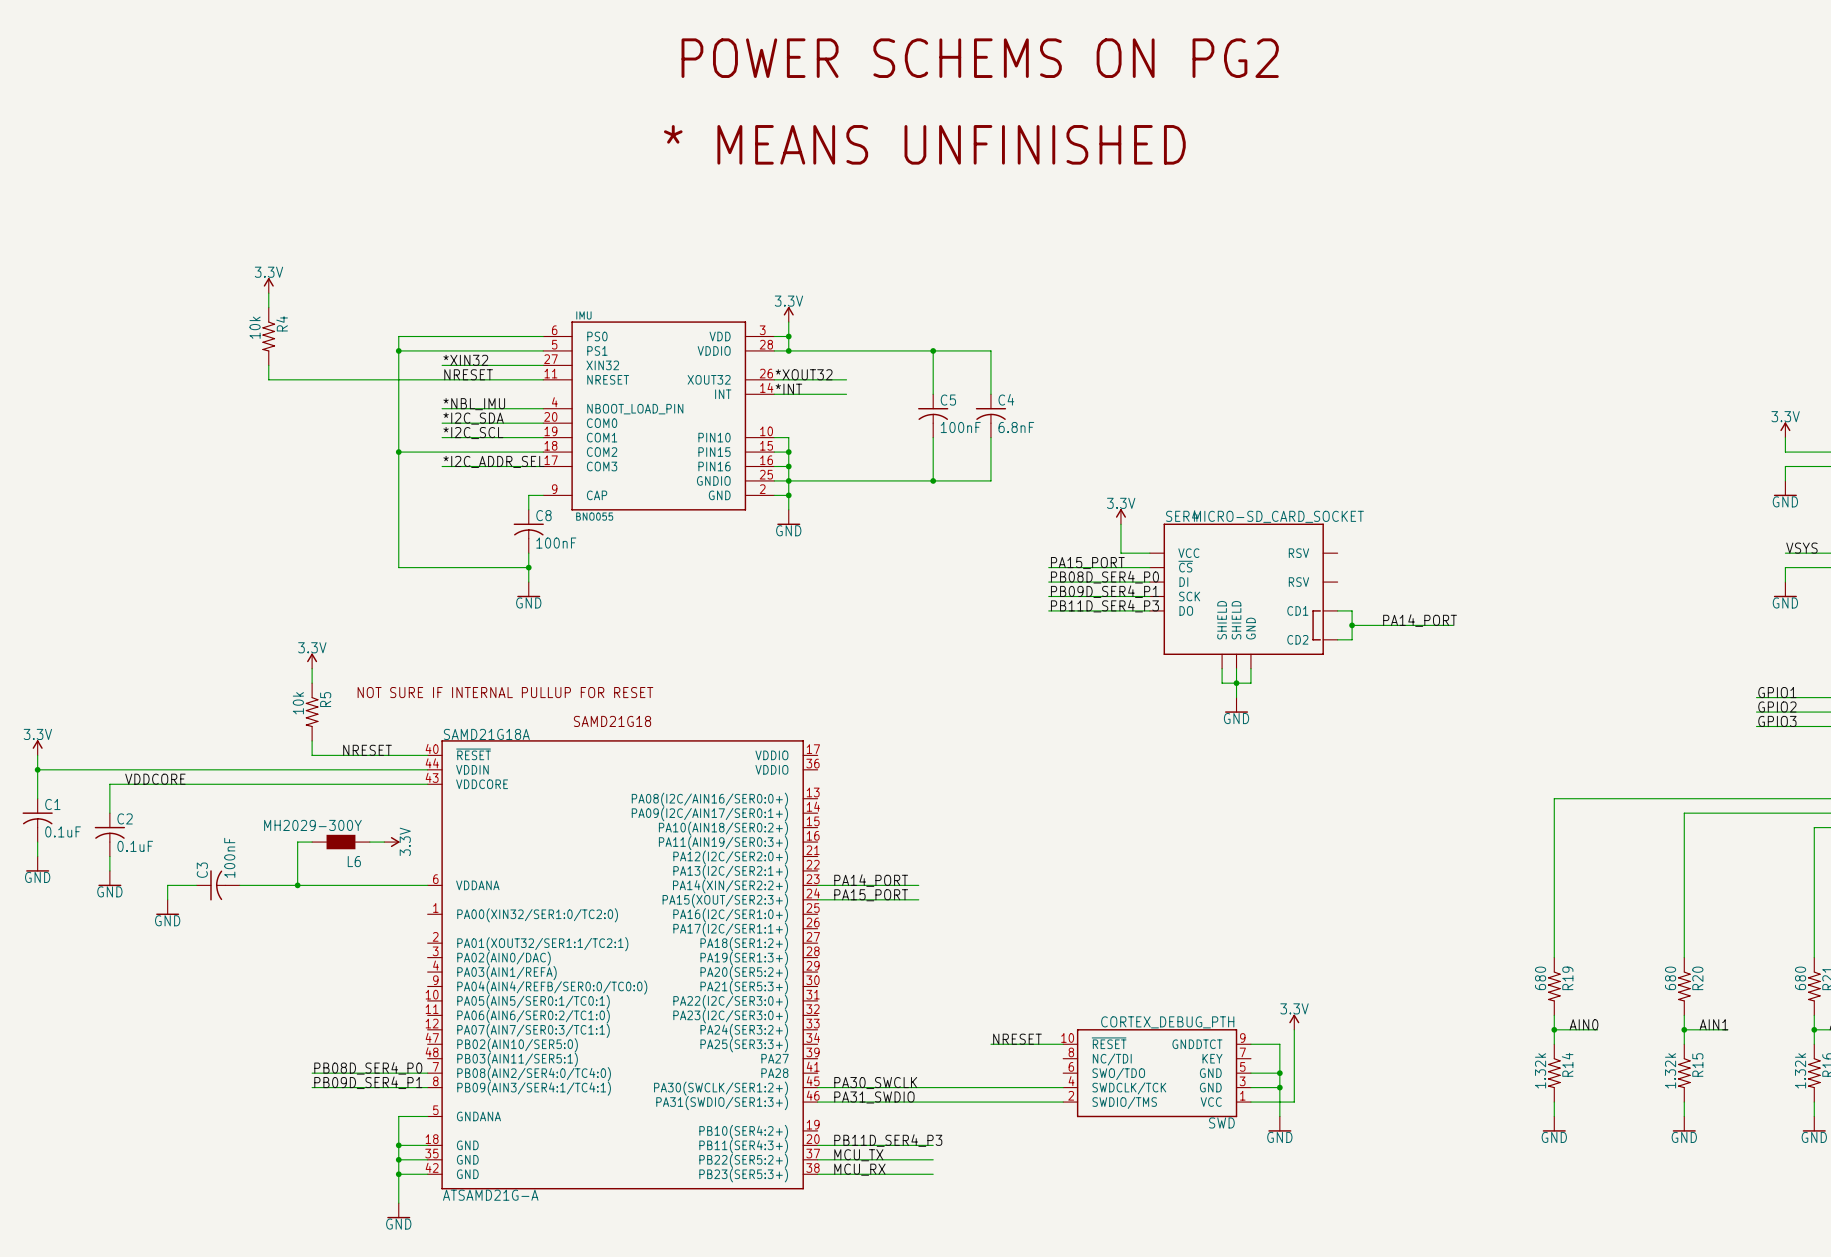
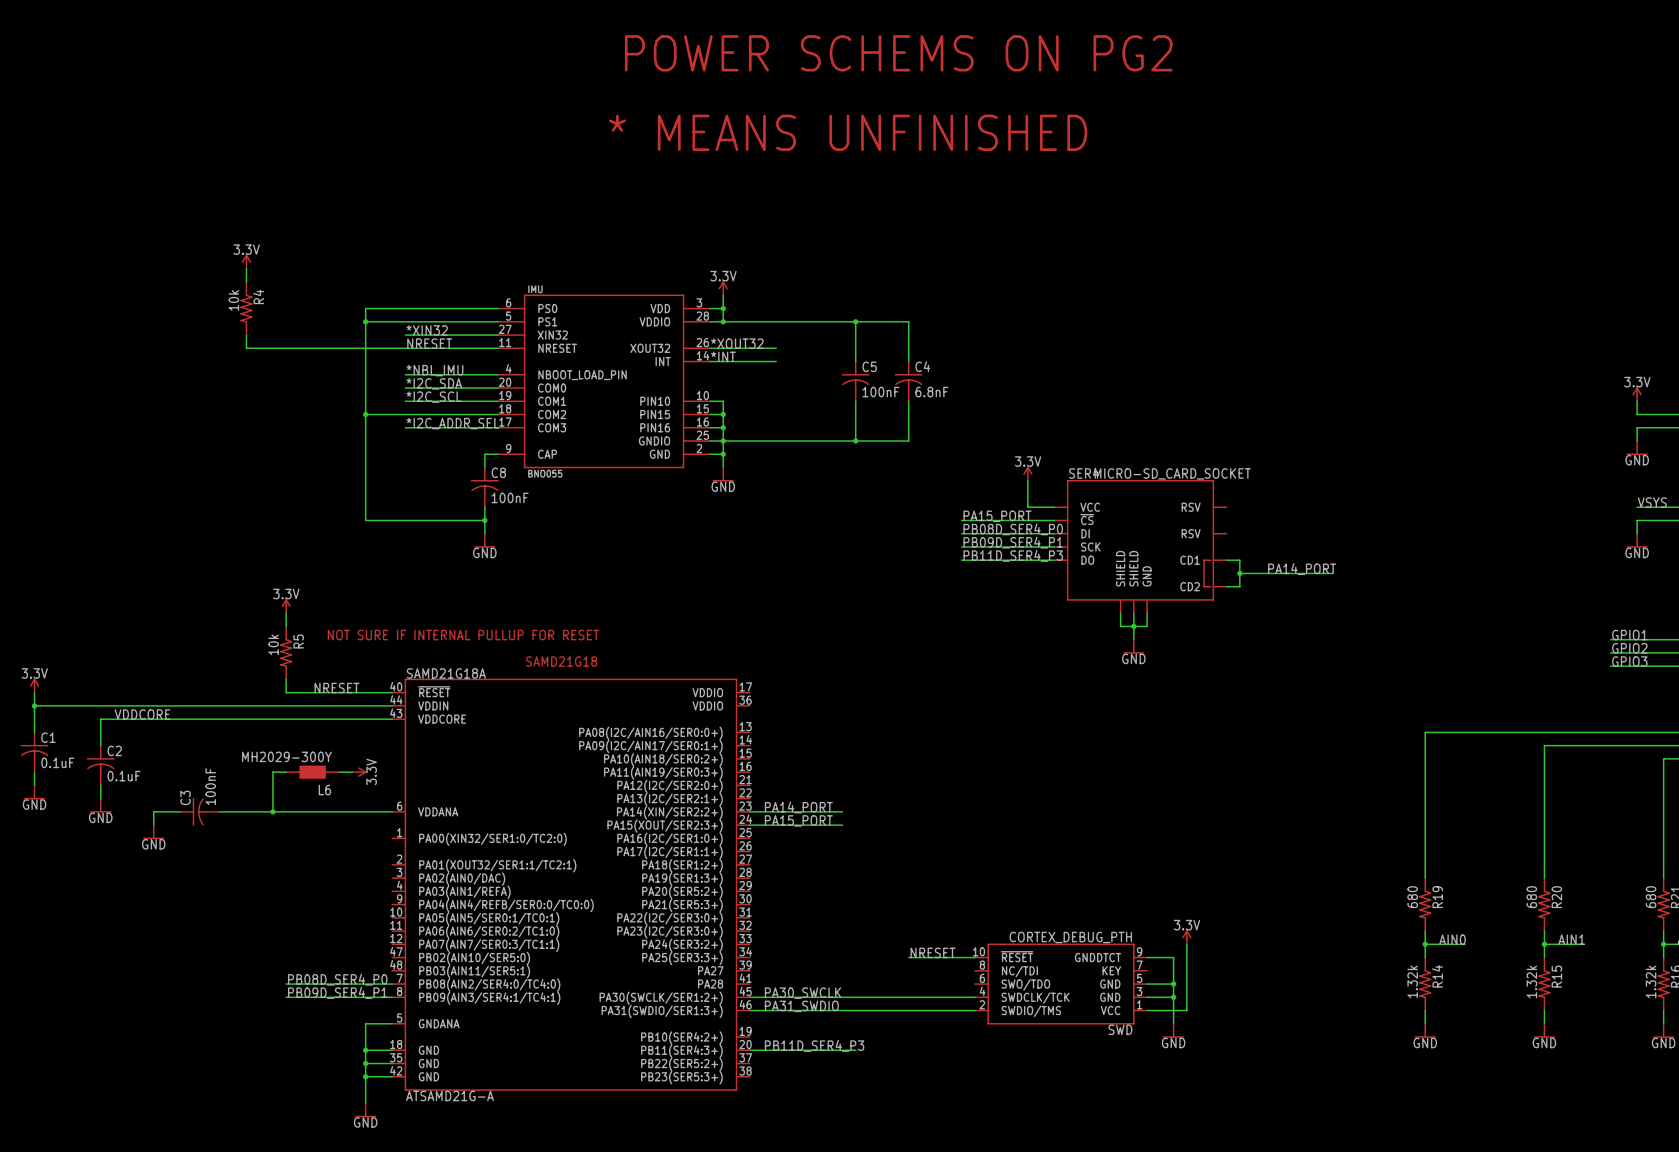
label: MCU_TX (858, 1155) -> none
wire: (817, 1159) (933, 1159) -> none
label: MCU_RX (859, 1169) -> none
wire: (817, 1174) (933, 1174) -> none

